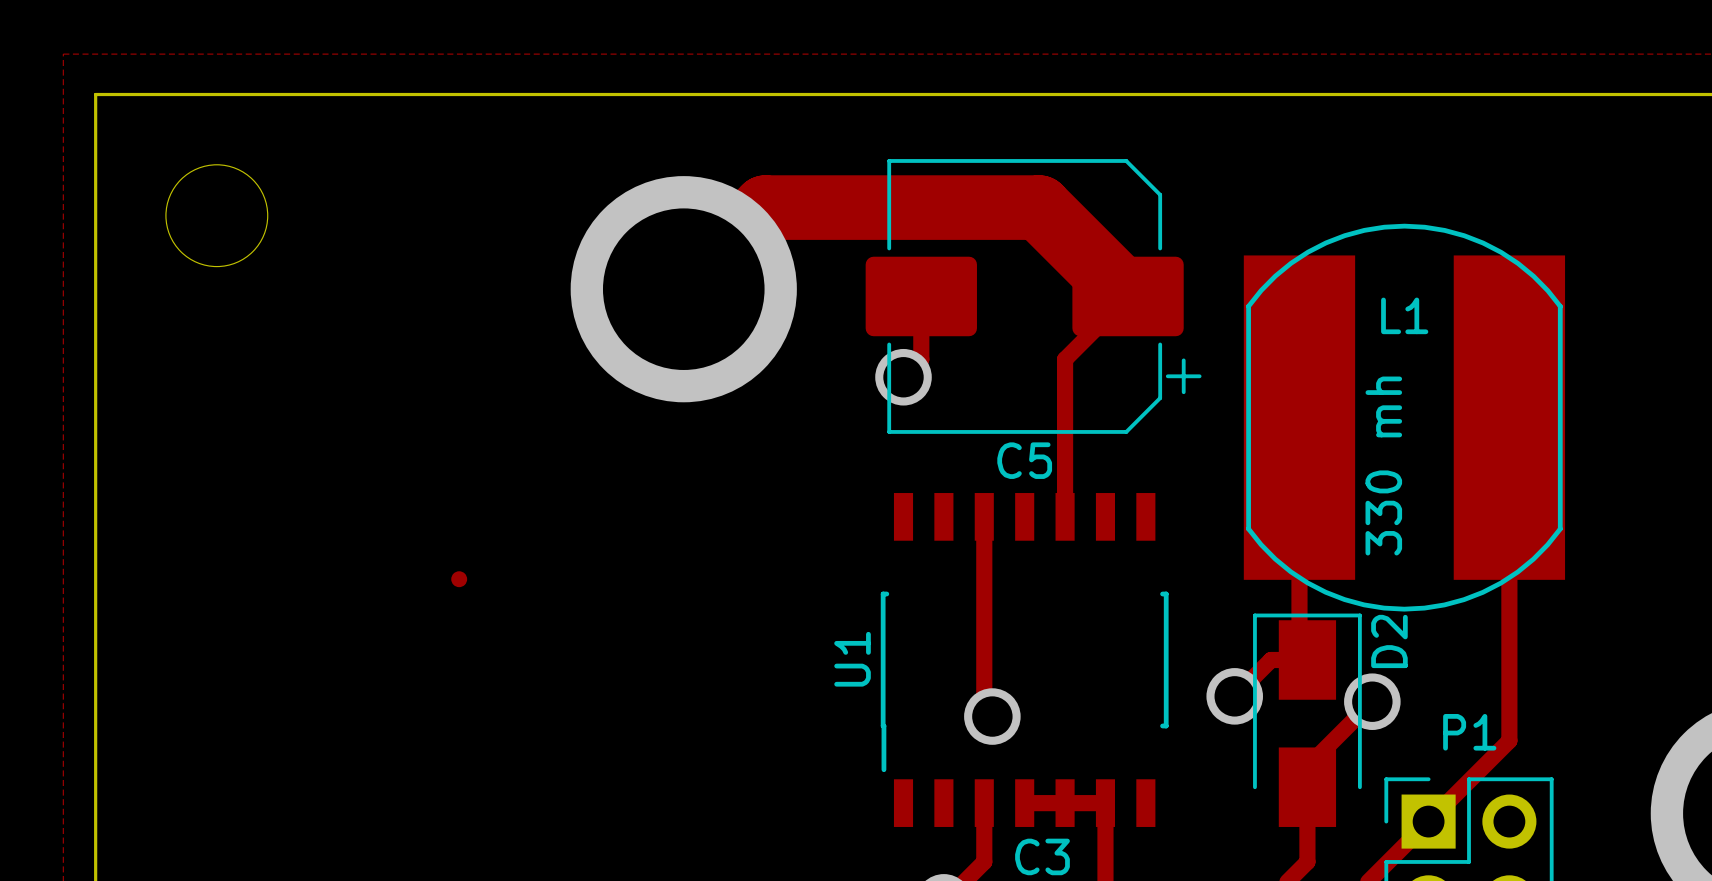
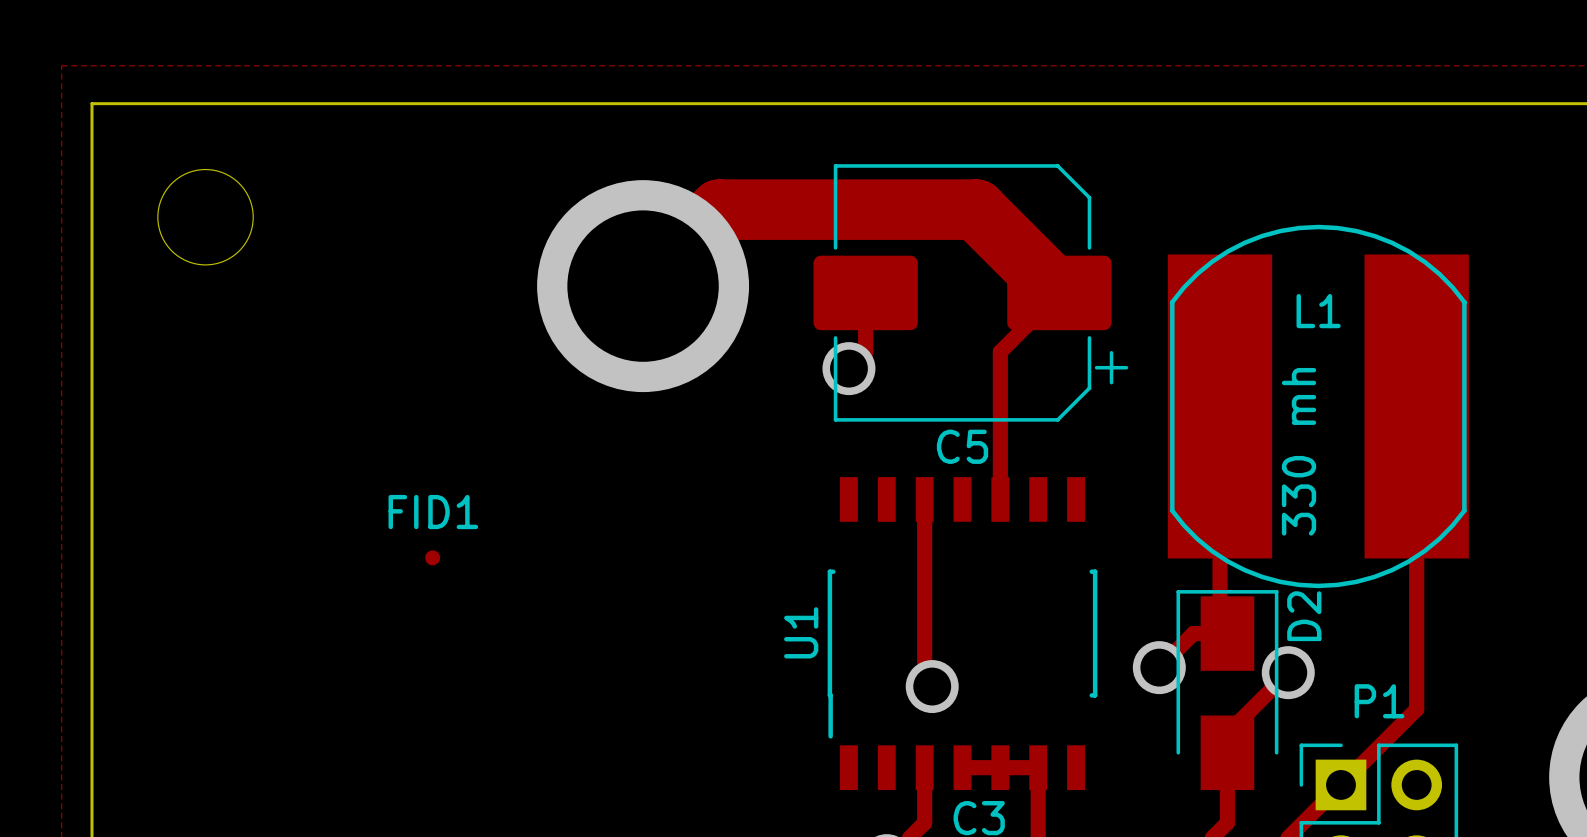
FID1 name: none -> FID1 (433, 512)

